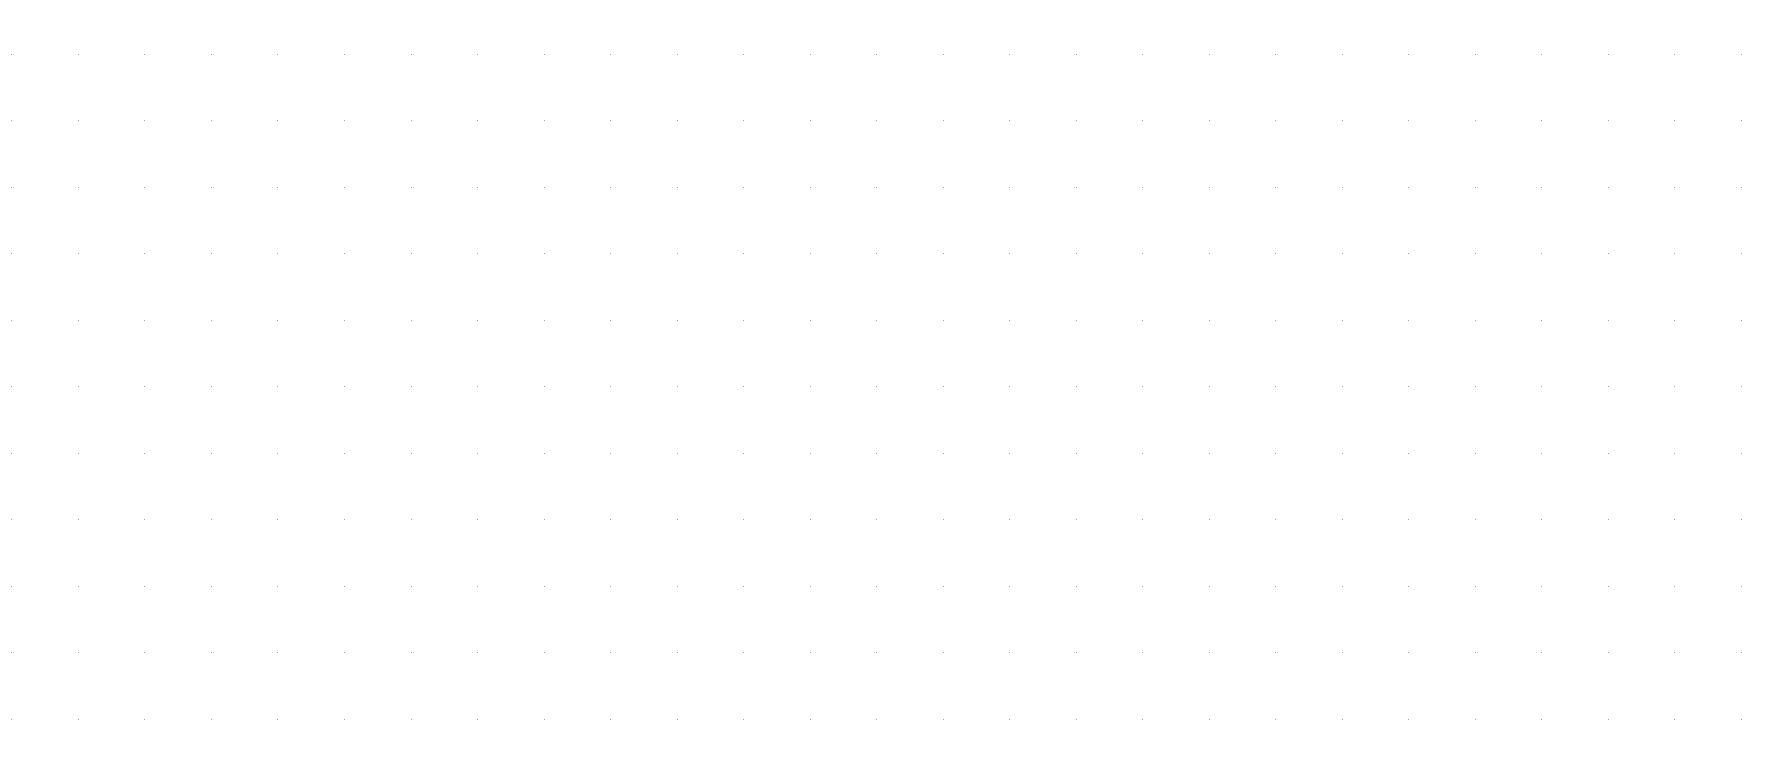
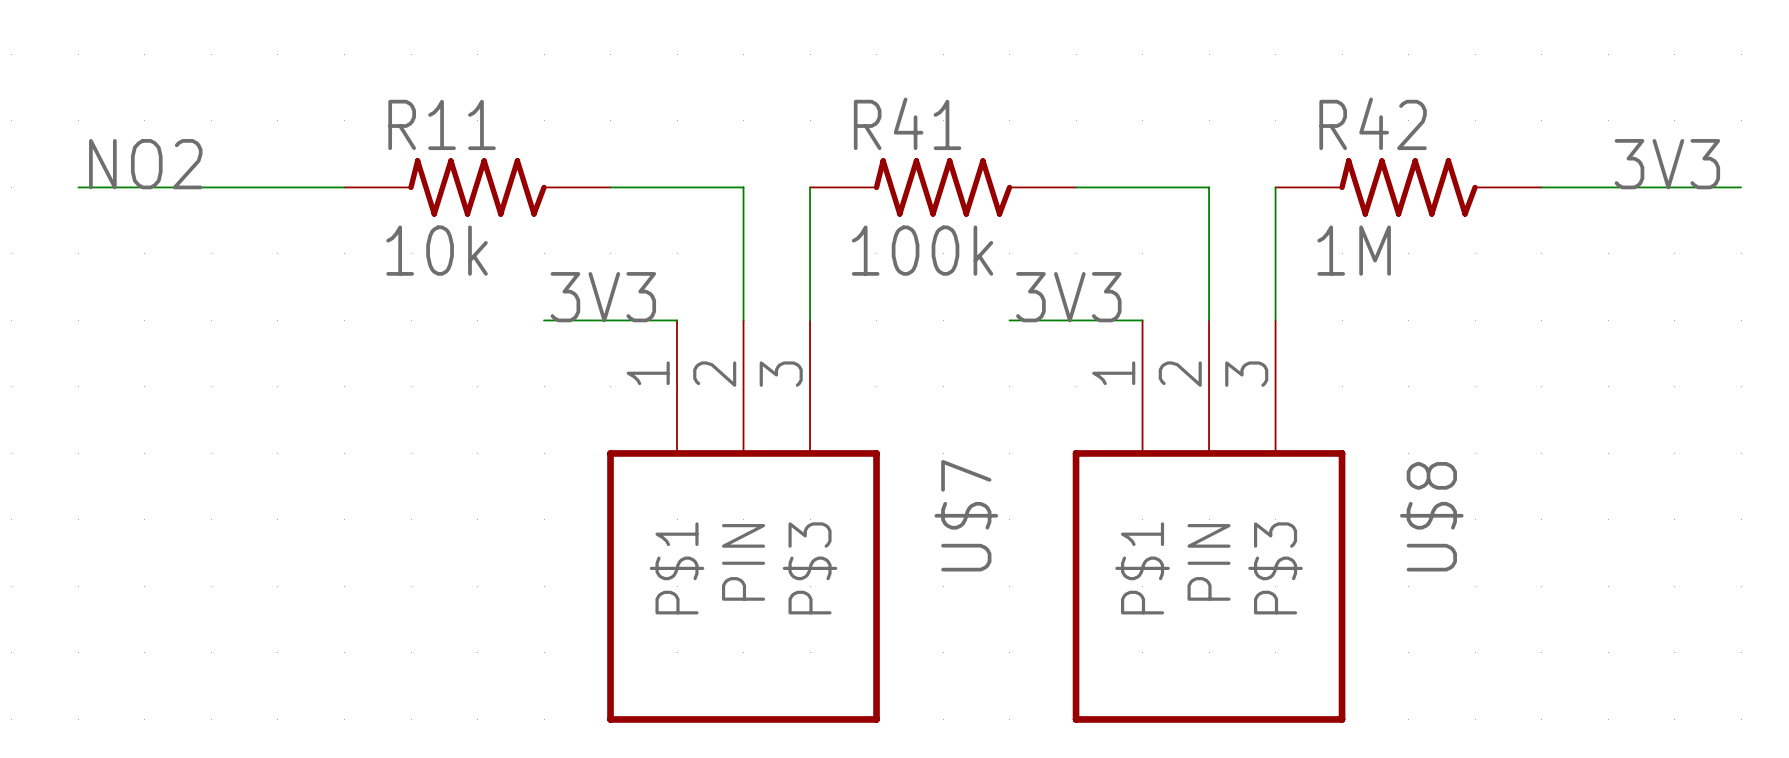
label: none -> NO2 (145, 164)
label: none -> 3V3 (1667, 164)
wire: none -> (78, 187) (344, 187)
R11: none -> 10k (477, 187)
wire: none -> (610, 187) (743, 187) (743, 320)
wire: none -> (810, 187) (810, 320)
R41: none -> 100k (943, 187)
wire: none -> (1076, 187) (1209, 187) (1209, 320)
wire: none -> (1275, 187) (1275, 320)
R42: none -> 1M (1408, 187)
wire: none -> (1541, 187) (1741, 187)
label: none -> 3V3 (603, 297)
label: none -> 3V3 (1068, 297)
wire: none -> (544, 320) (677, 320)
wire: none -> (1009, 320) (1142, 320)
U$7: none -> (743, 521)
U$8: none -> (1209, 521)

